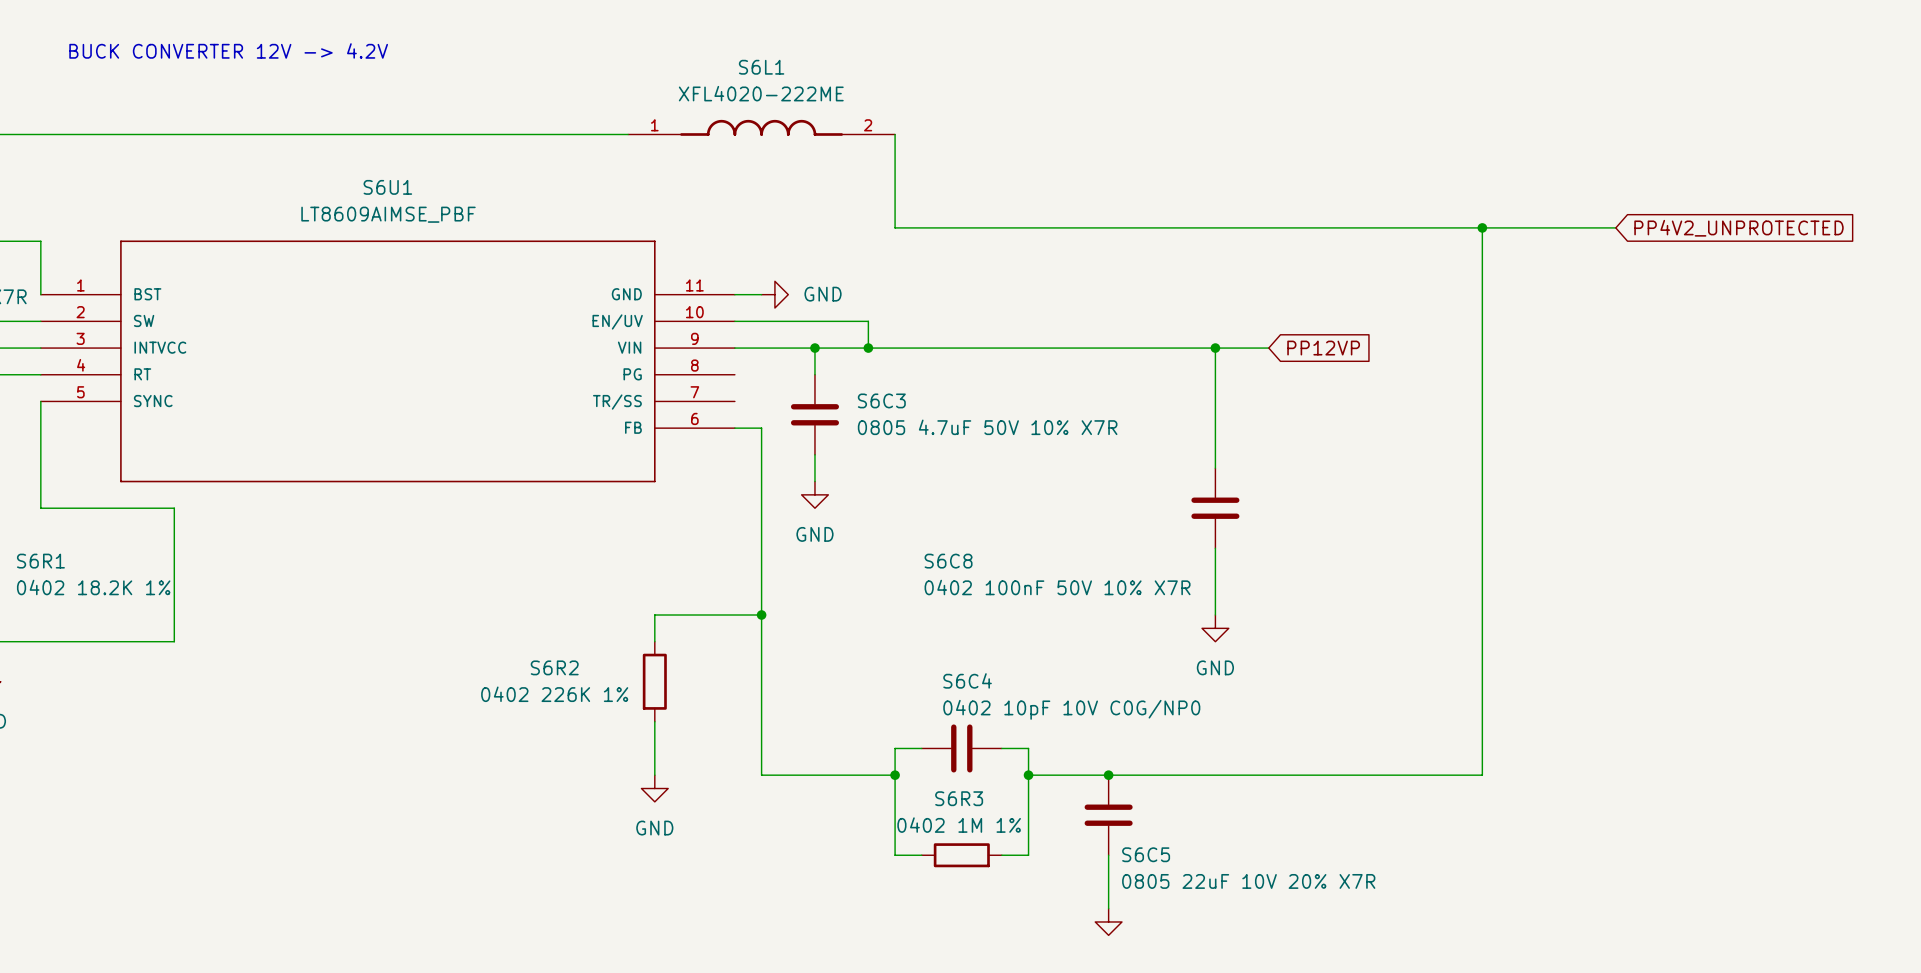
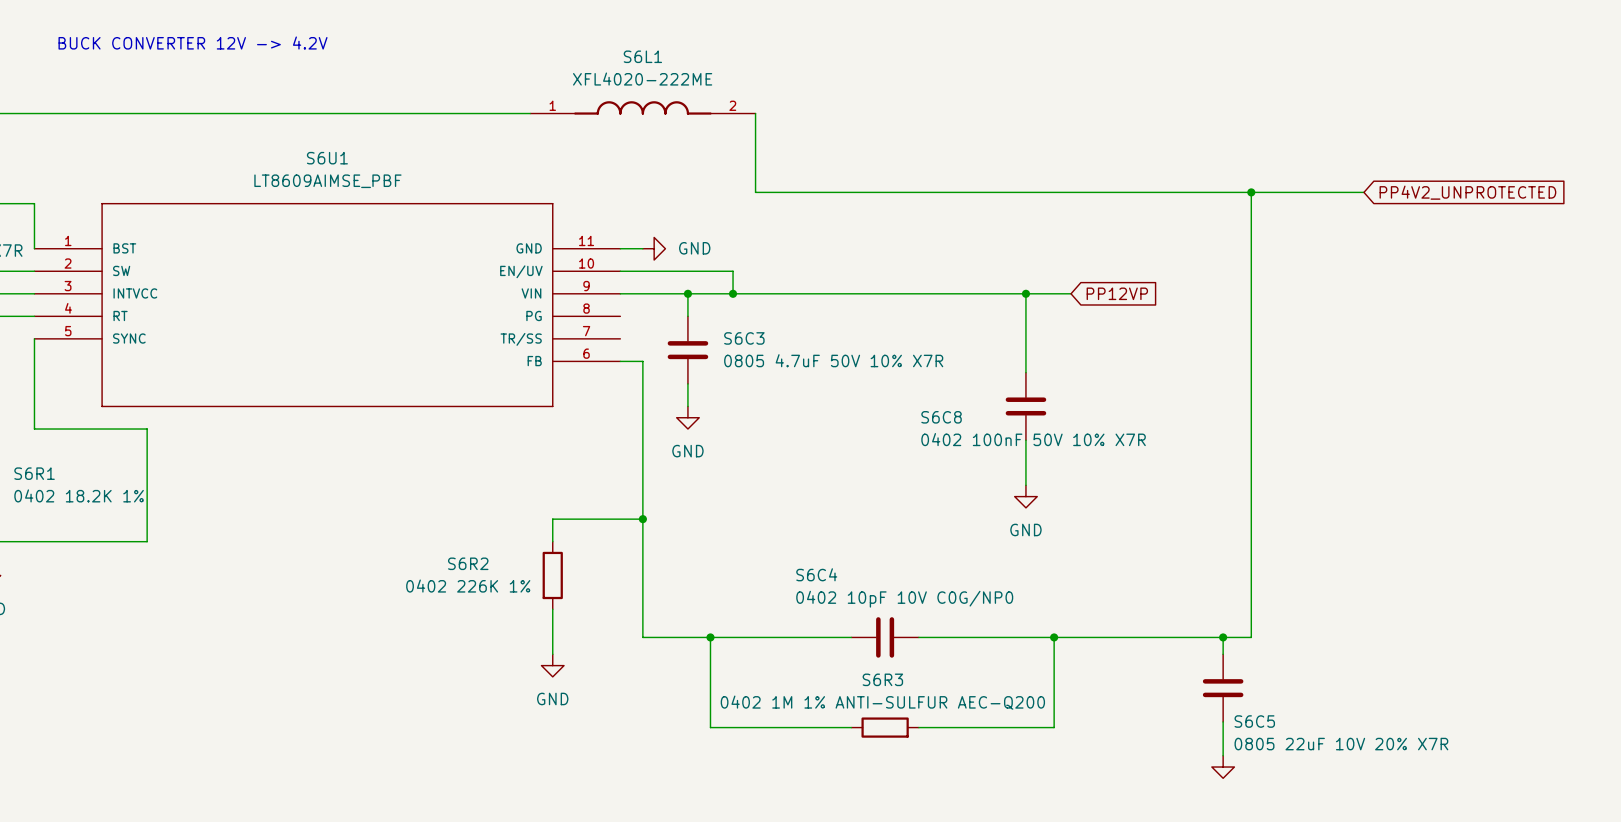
S6C8 position: (1215, 508) -> (1025, 406)
S6C8 name position: S6C8 (948, 561) -> S6C8 (941, 417)
wire: (1215, 574) (1215, 615) -> none
S6C8 value position: 0402 100nF 50V 10% X7R (1057, 587) -> 0402 100nF 50V 10% X7R (1033, 439)
power symbol position: GND (1215, 628) -> GND (1025, 496)
wire: (921, 748) (895, 748) (895, 855) (921, 855) -> none
S6C4 position: (961, 748) -> (885, 637)
wire: (1001, 748) (1028, 748) (1028, 855) (1001, 855) -> none
wire: (761, 755) (761, 775) (895, 775) -> (642, 637) (851, 637)
wire: none -> (710, 637) (710, 727) (851, 727)
wire: none -> (1054, 637) (1054, 727) (918, 727)
junction: none -> (1054, 637)
wire: none -> (1223, 637) (1223, 654)
junction: none -> (1223, 637)
wire: (1482, 755) (1482, 775) (1028, 775) -> (1251, 637) (918, 637)
junction position: (895, 775) -> (710, 637)
junction: (1028, 775) -> none
junction: (1108, 775) -> none
S6C5 position: (1108, 815) -> (1223, 688)
S6R3 value: 0402 1M 1% (959, 825) -> 0402 1M 1% ANTI-SULFUR AEC-Q200 (882, 702)
S6R3 position: (961, 855) -> (885, 727)
wire: (1108, 855) (1108, 908) -> none
wire: none -> (1223, 721) (1223, 755)
power symbol: none -> (1223, 767)
power symbol: (1108, 921) -> none

